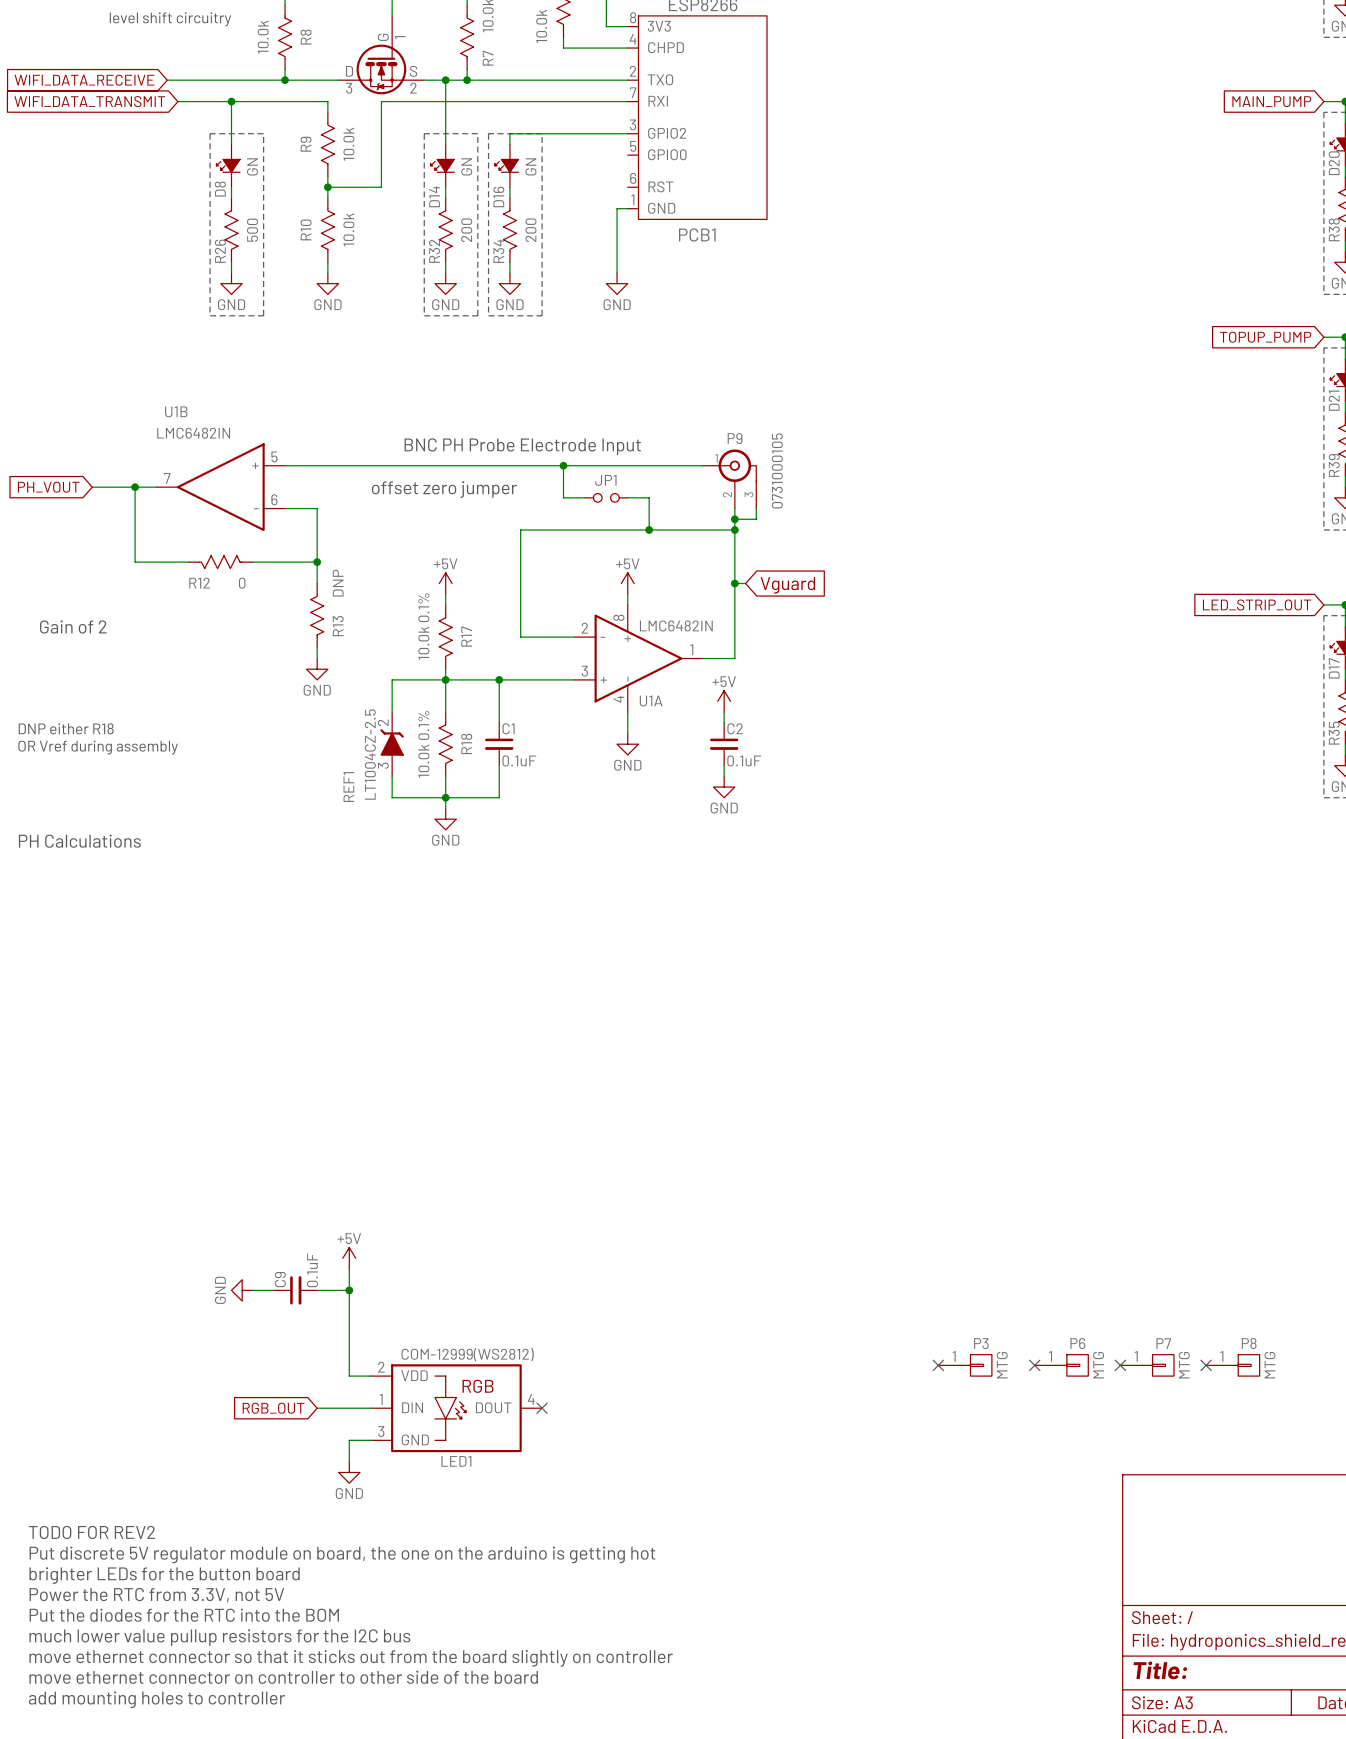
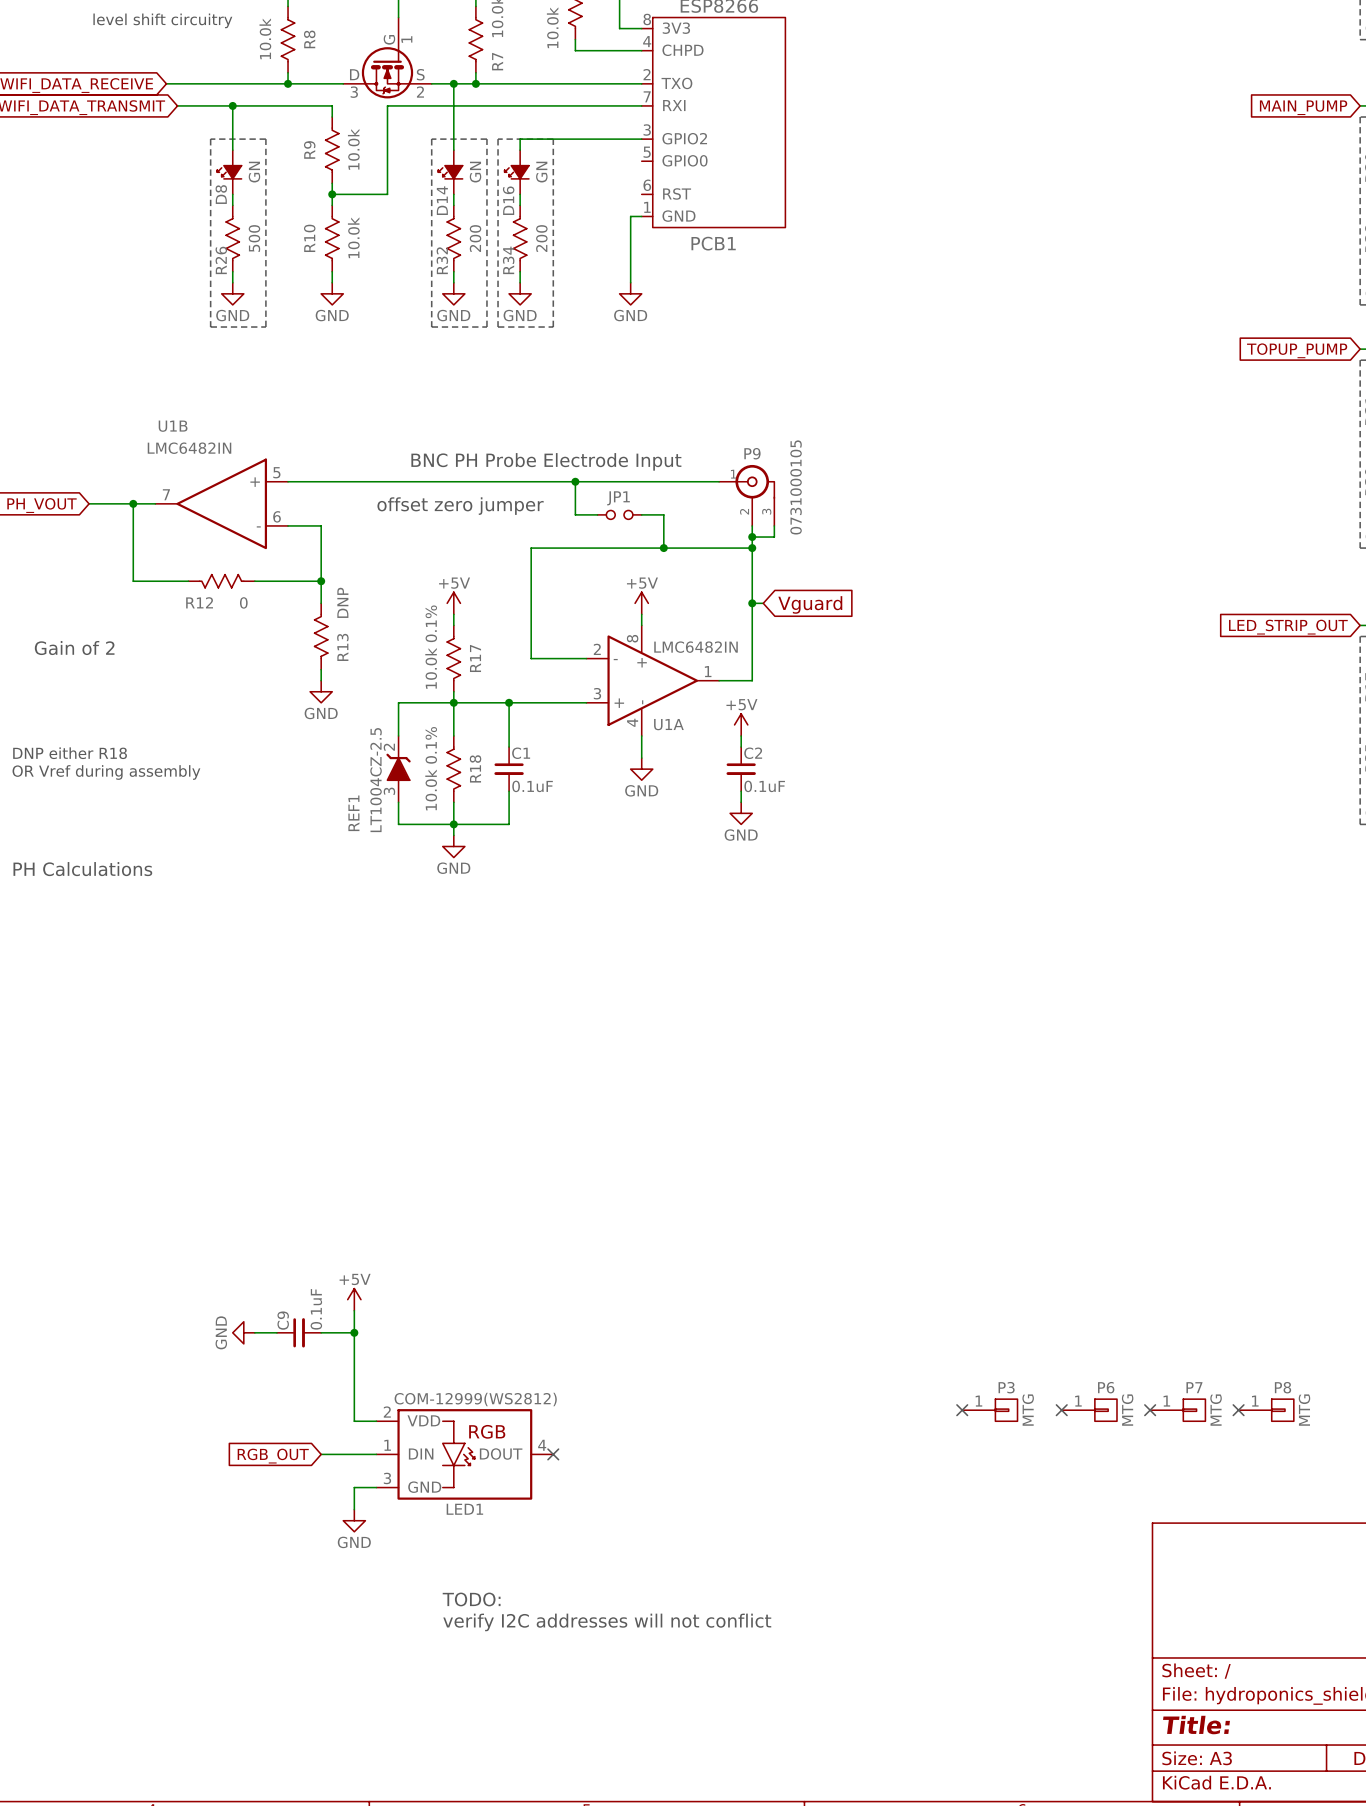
text: TODO FOR REV2 (91, 1532) -> none
text: none -> TODO: (471, 1599)
text: Put discrete 5V regulator module on board, the one on the arduino is getting hot (342, 1554) -> none
text: none -> verify I2C addresses will not conflict (607, 1622)
text: brighter LEDs for the button board (164, 1575) -> none
text: Power the RTC from 3.3V, not 5V (156, 1595) -> none
text: Put the diodes for the RTC into the BOM (184, 1615) -> none
text: much lower value pullup resistors for the I2C bus (219, 1637) -> none
text: move ethernet connector so that it sticks out from the board slightly on controller (351, 1658) -> none
text: move ethernet connector on controller to other side of the board (283, 1677) -> none
text: add mounting holes to controller (156, 1699) -> none

